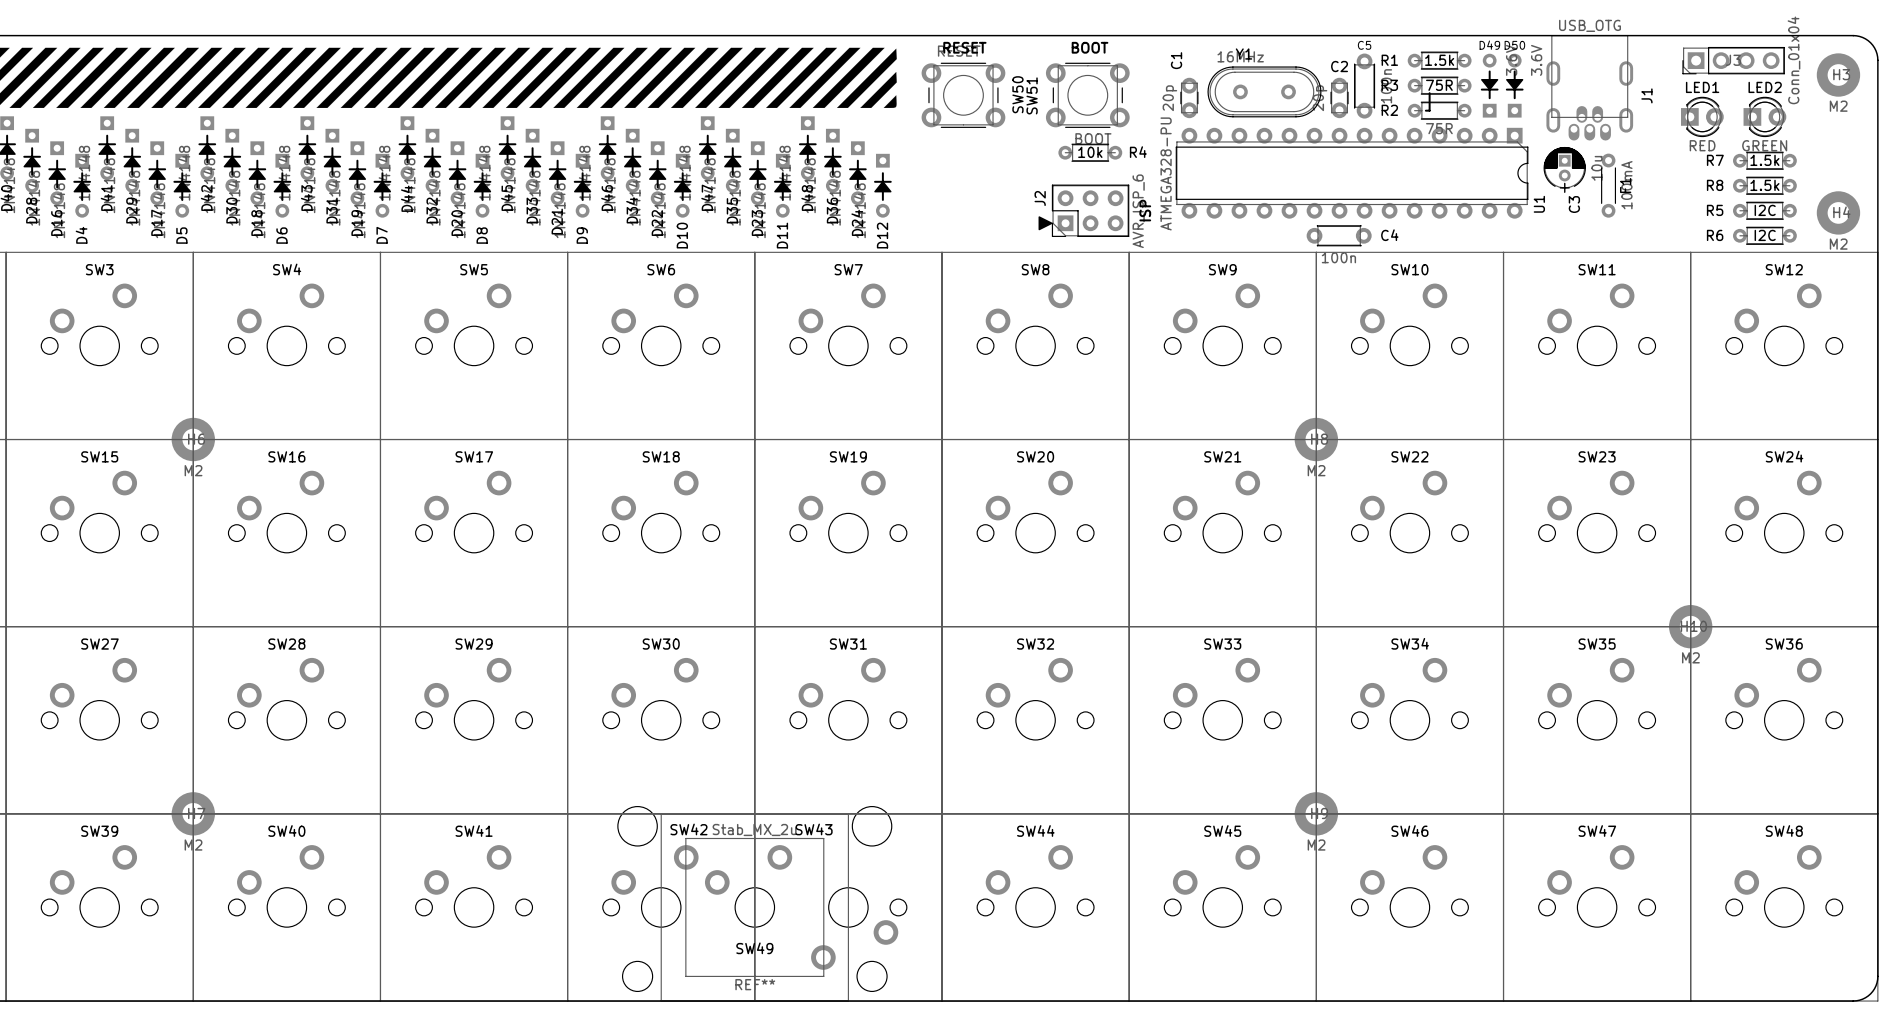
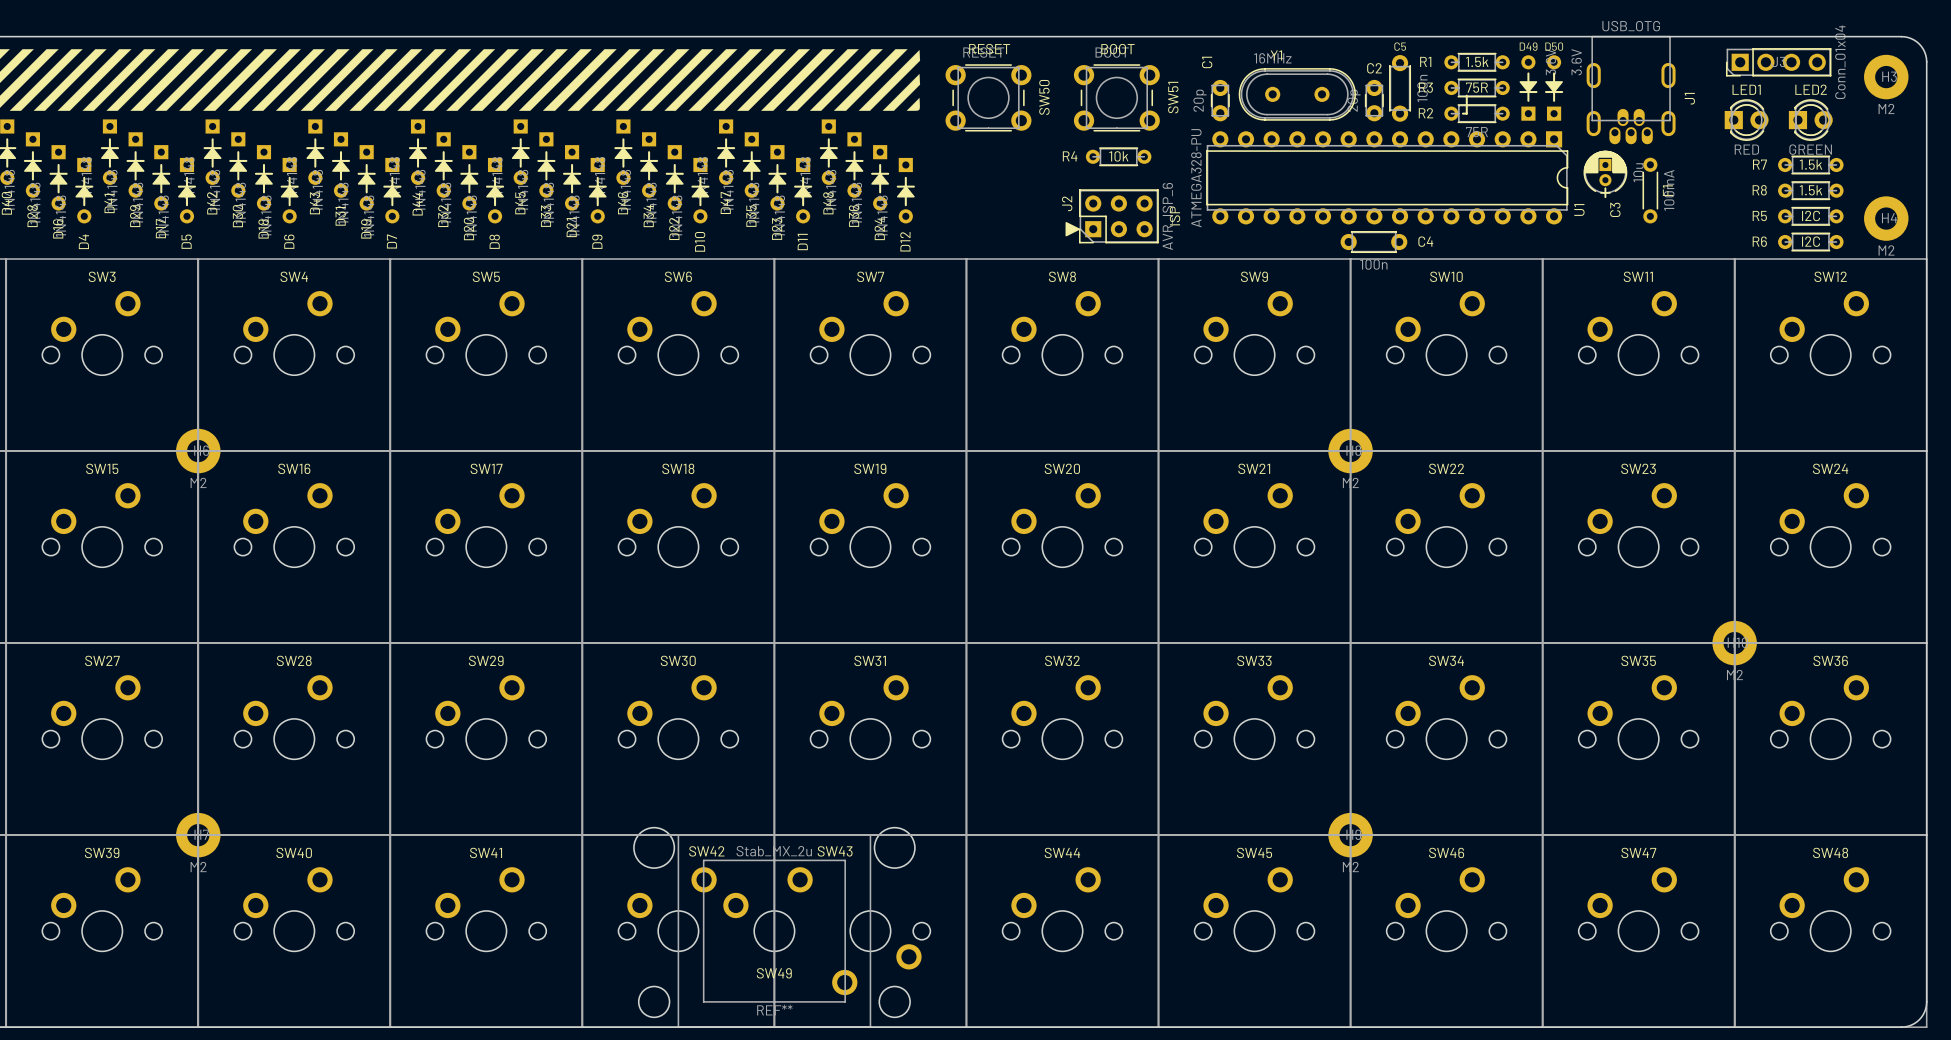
SW51 rotation: 0° (1087, 95) -> 180° (1116, 97)
R4 name position: R4 (1138, 152) -> R4 (1070, 156)

